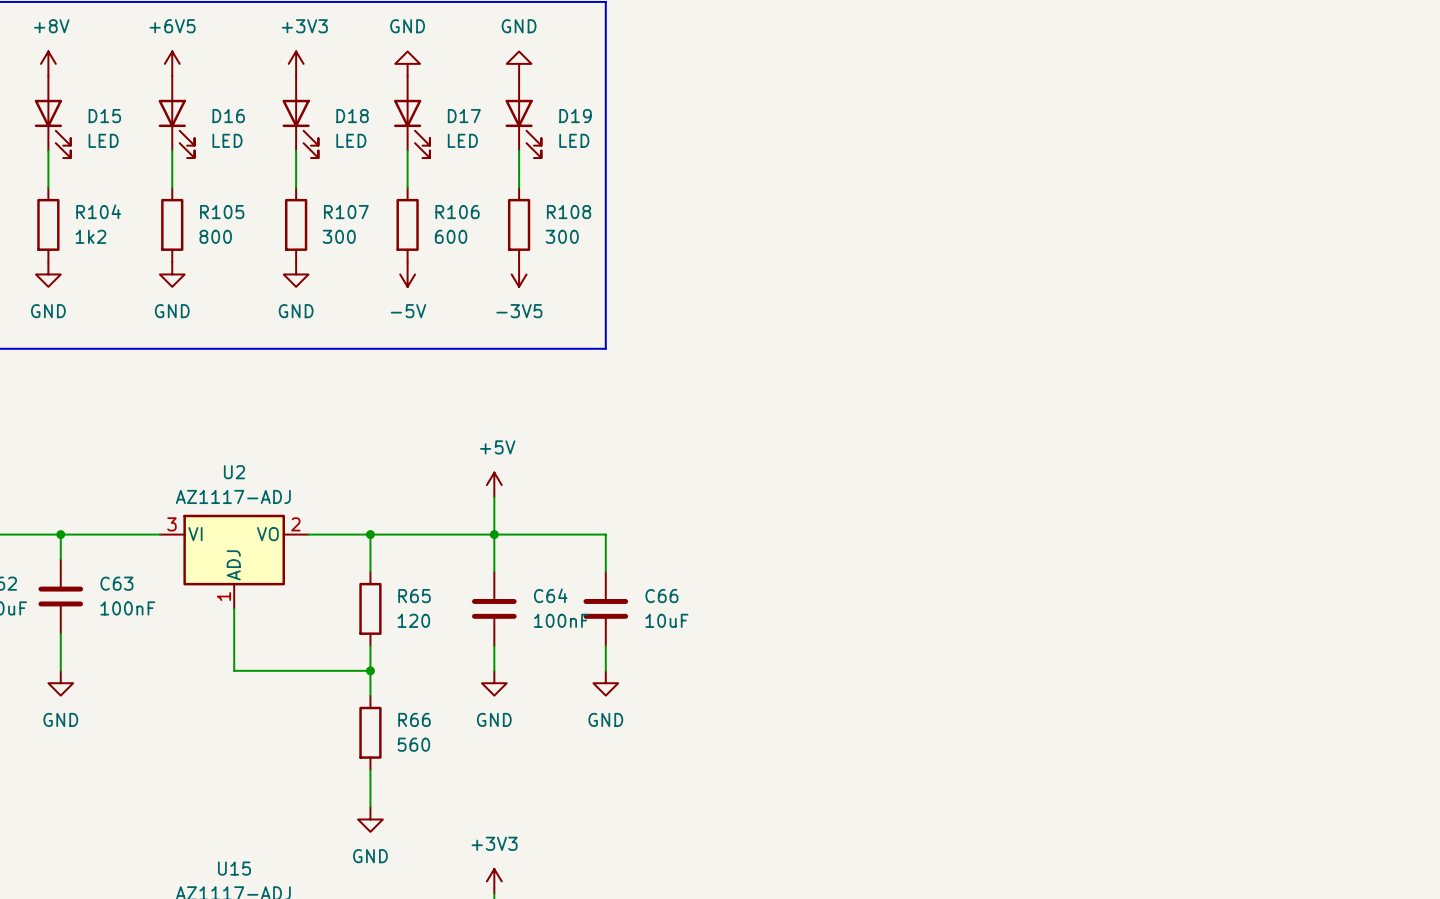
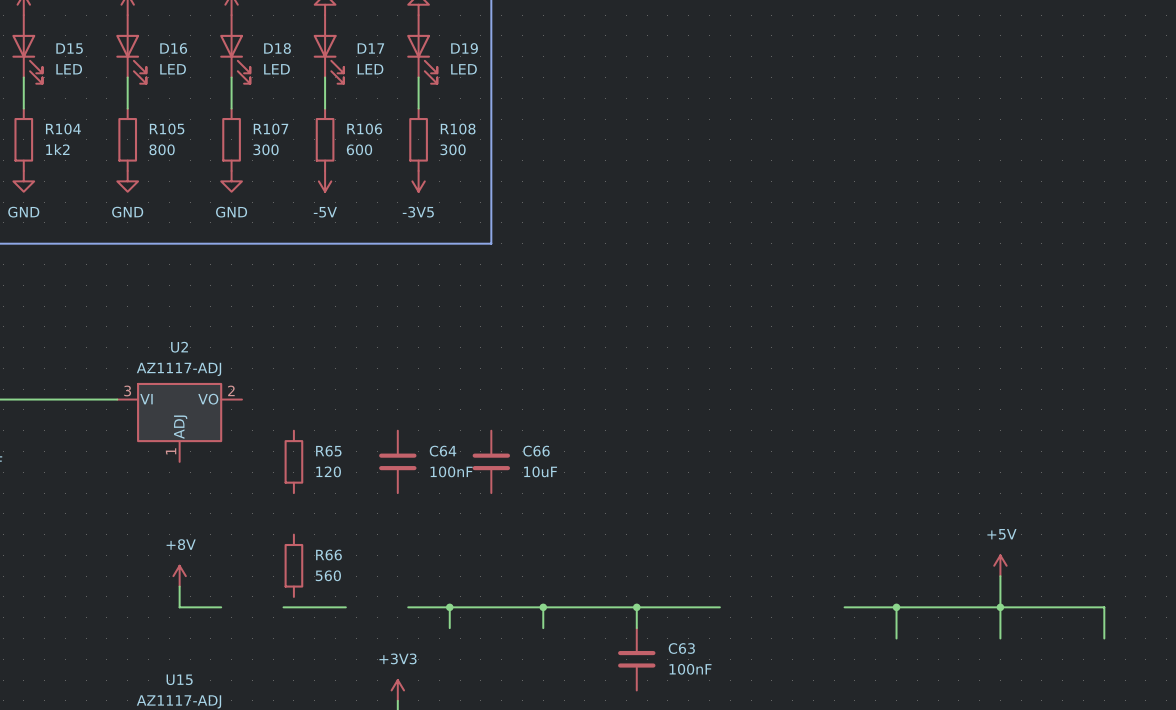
power symbol: +5V (494, 485) -> none
wire: (494, 497) (494, 571) -> none
wire: (60, 534) (60, 559) -> none
junction: (60, 534) -> none
wire: (308, 534) (605, 534) (605, 571) -> none
wire: (370, 534) (370, 571) -> none
junction: (370, 534) -> none
junction: (494, 534) -> none
C63 position: (60, 596) -> (636, 659)
wire: (234, 608) (234, 670) (370, 670) -> none
wire: (60, 633) (60, 670) -> none
wire: (370, 646) (370, 695) -> none
wire: (494, 646) (494, 670) -> (449, 607) (449, 628)
wire: (605, 646) (605, 670) -> (543, 607) (543, 628)
junction: (370, 670) -> none
power symbol: GND (60, 683) -> none
power symbol: GND (494, 683) -> none
power symbol: GND (605, 683) -> none
power symbol: none -> +5V (1000, 565)
power symbol: none -> +8V (179, 576)
wire: none -> (1000, 576) (1000, 638)
wire: none -> (179, 586) (179, 607) (221, 607)
wire: (370, 769) (370, 807) -> none
wire: none -> (283, 607) (345, 607)
wire: none -> (408, 607) (719, 607)
junction: none -> (449, 607)
junction: none -> (543, 607)
wire: none -> (636, 607) (636, 628)
junction: none -> (636, 607)
wire: none -> (844, 607) (1104, 607) (1104, 638)
wire: none -> (896, 607) (896, 638)
junction: none -> (896, 607)
junction: none -> (1000, 607)
power symbol: GND (370, 819) -> none

